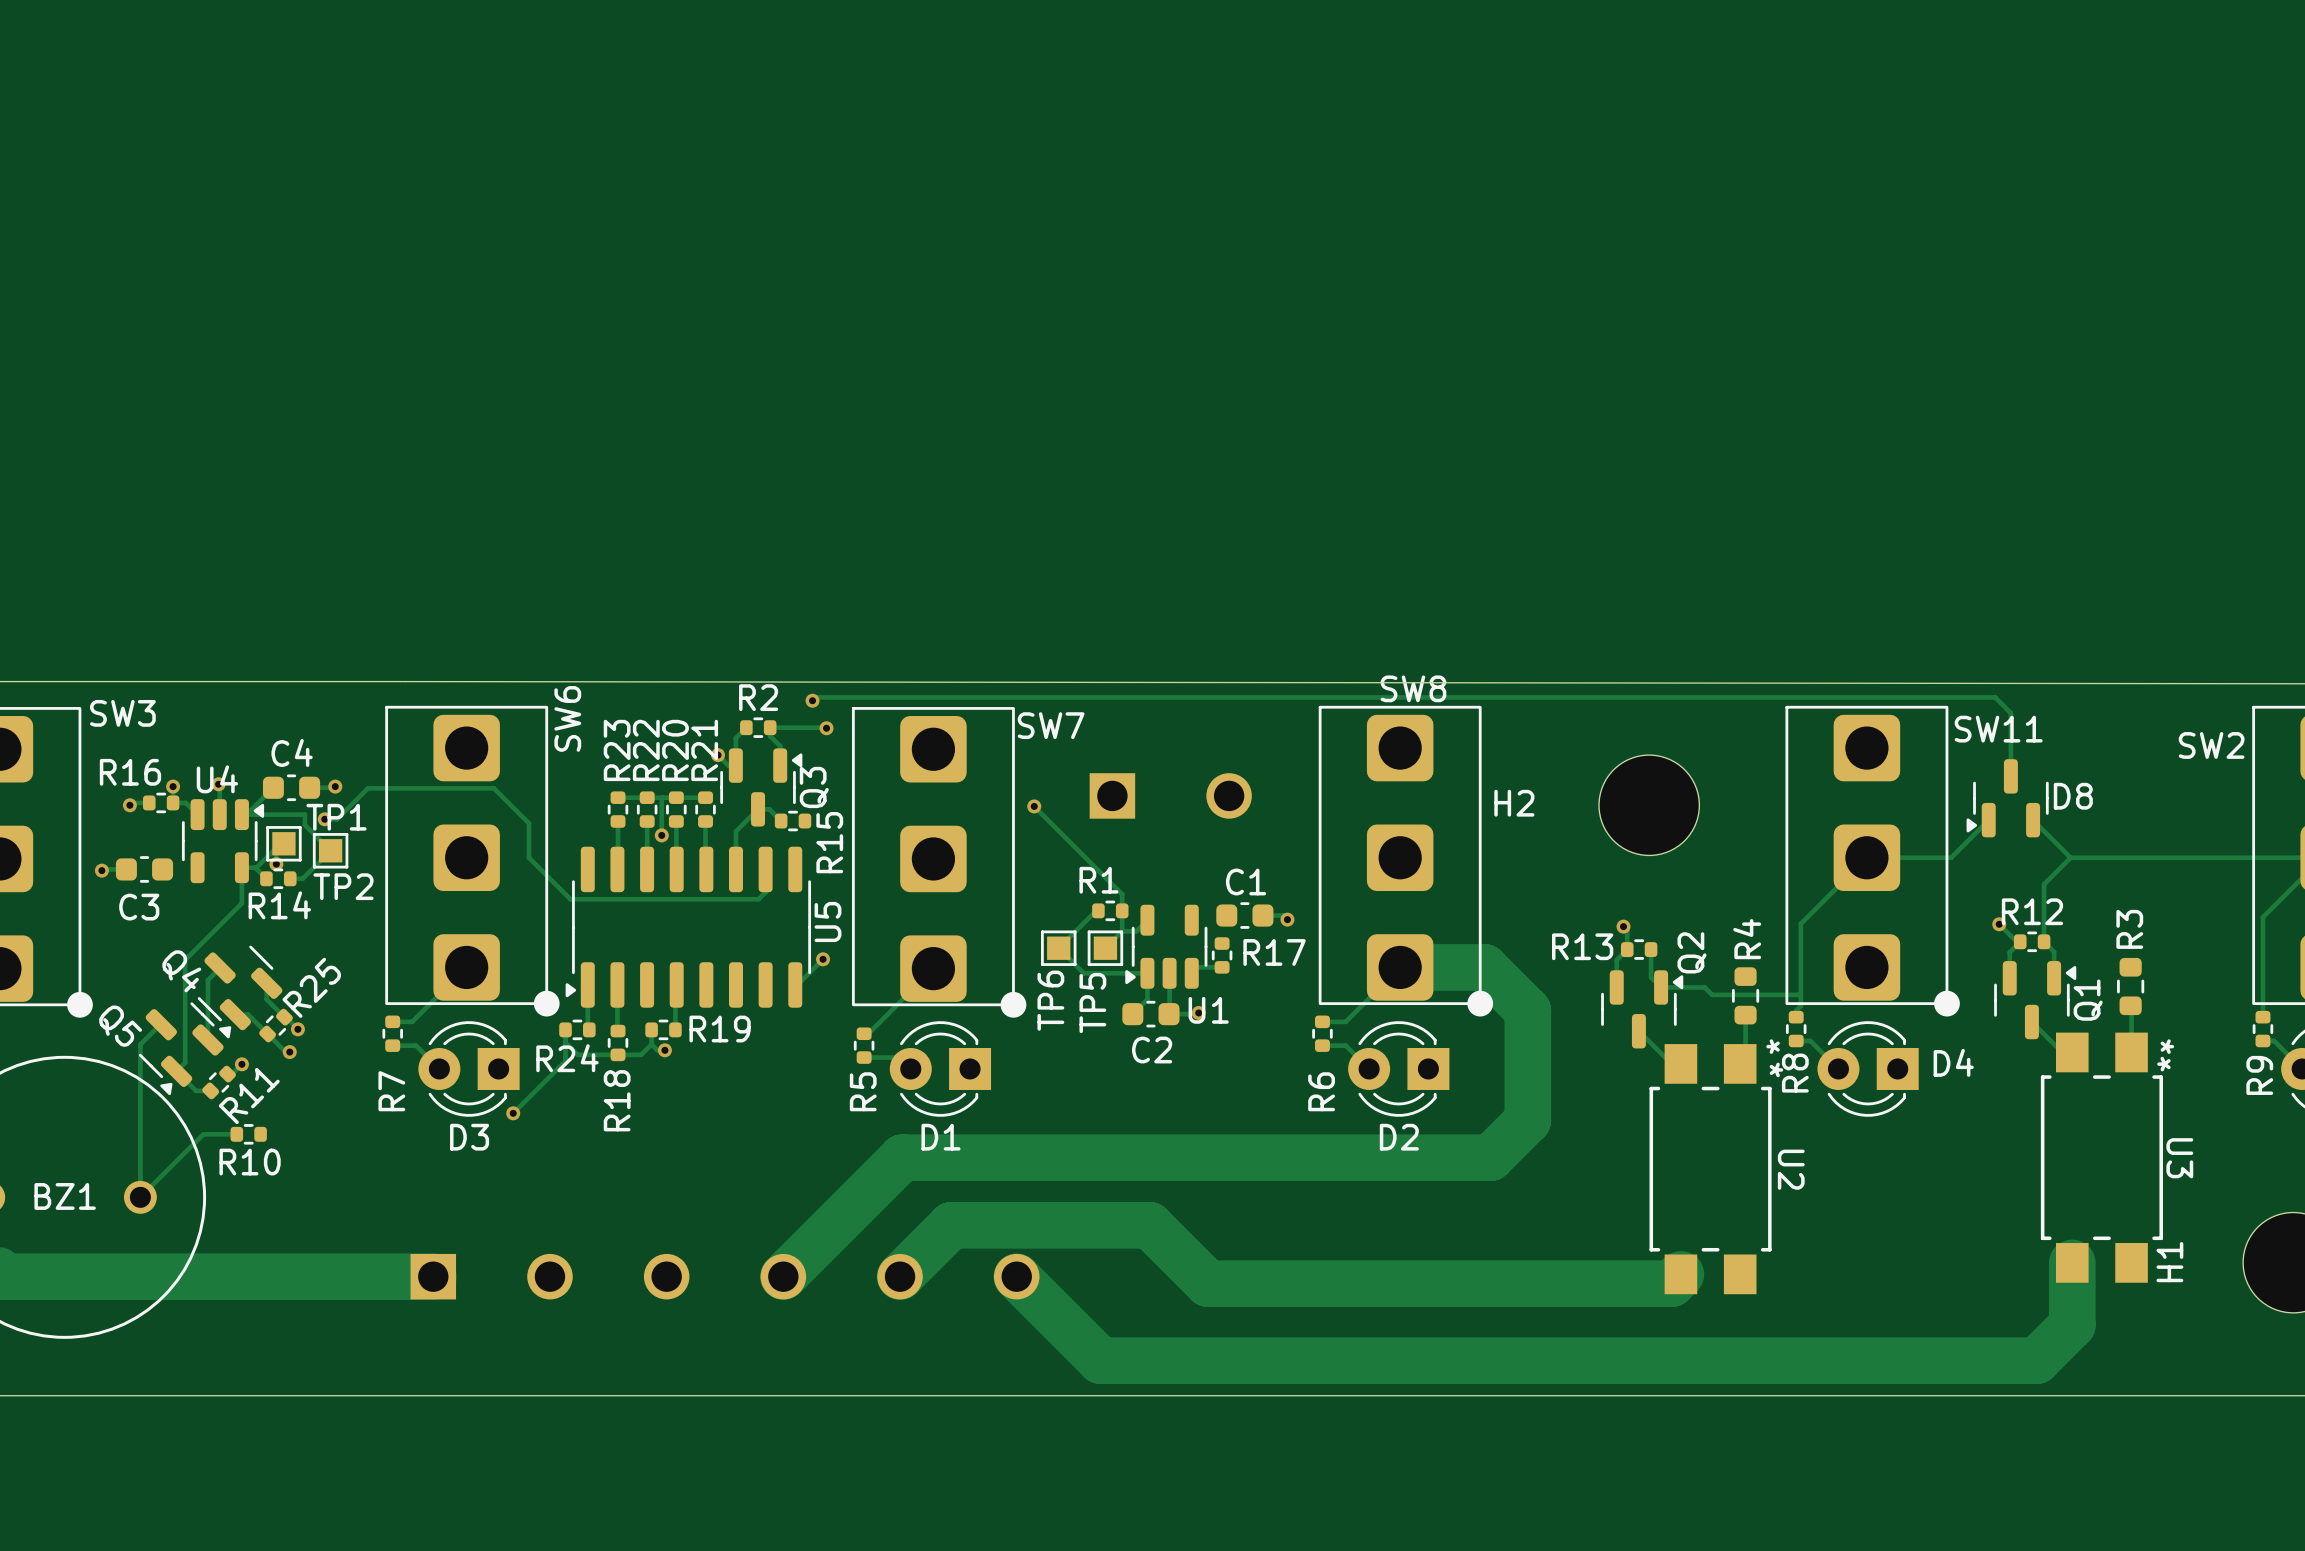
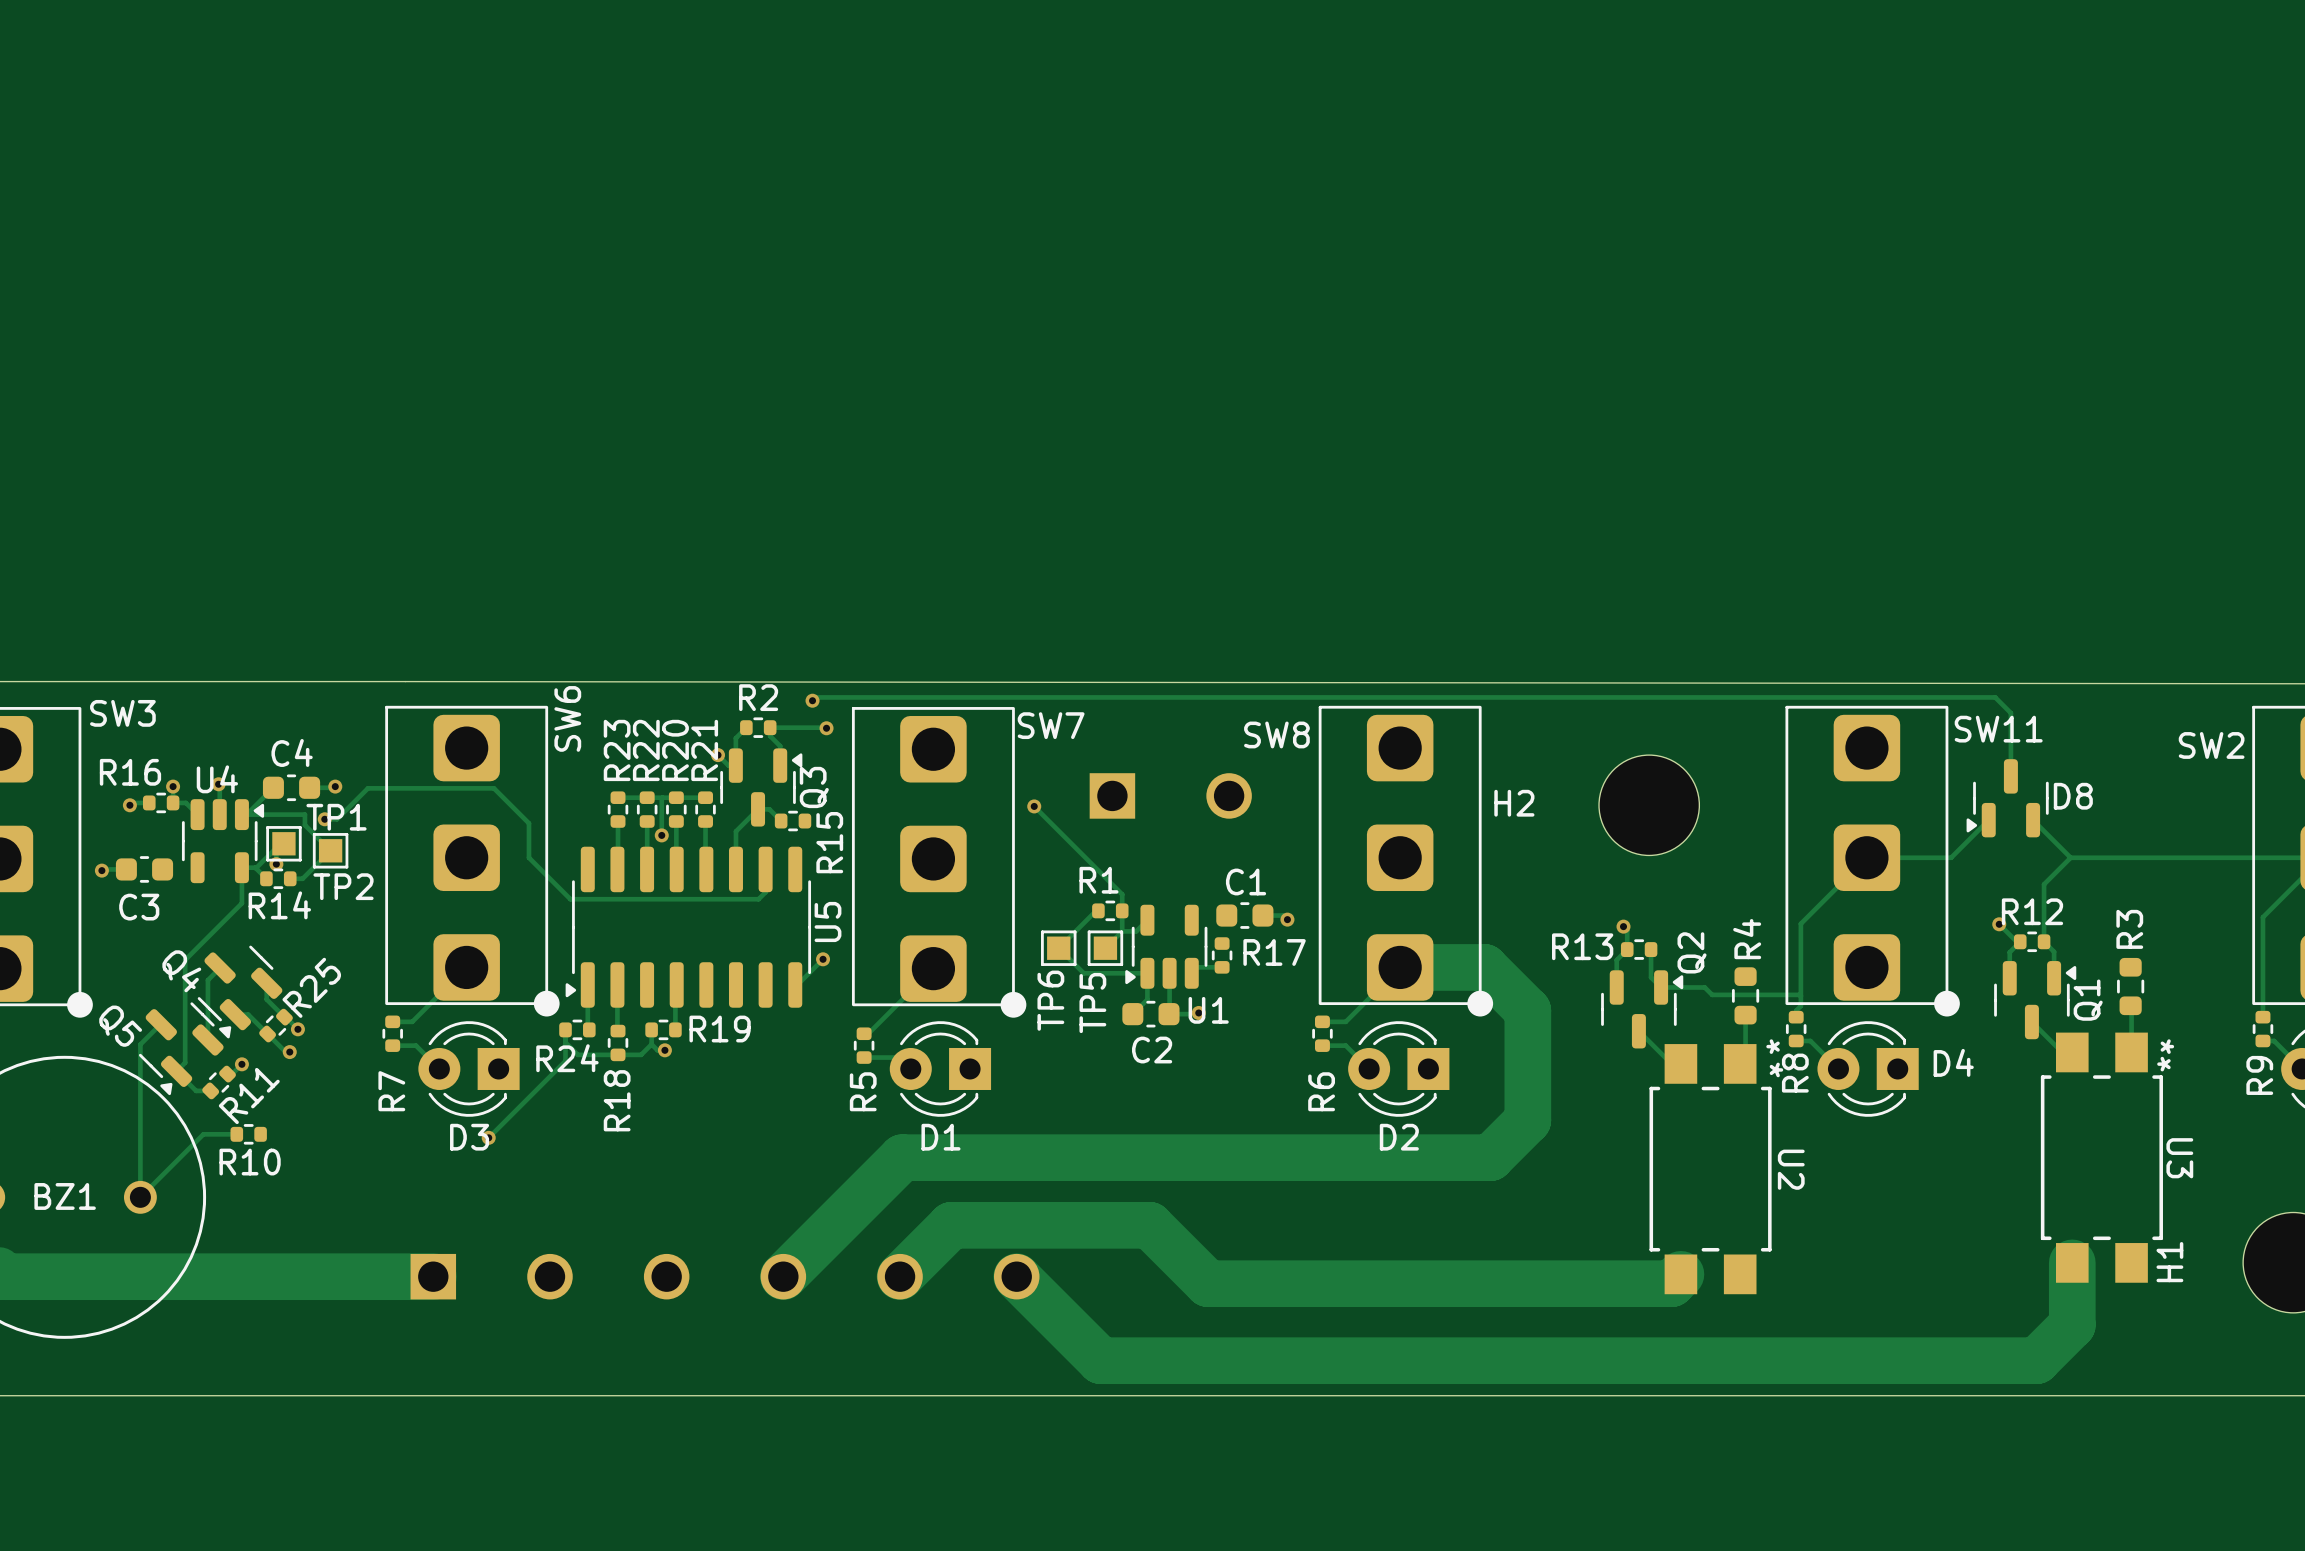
SW8 name position: SW8 (1413, 688) -> SW8 (1276, 734)
track: none -> (513, 1113) (488, 1137)
via position: (513, 1113) -> (488, 1137)

